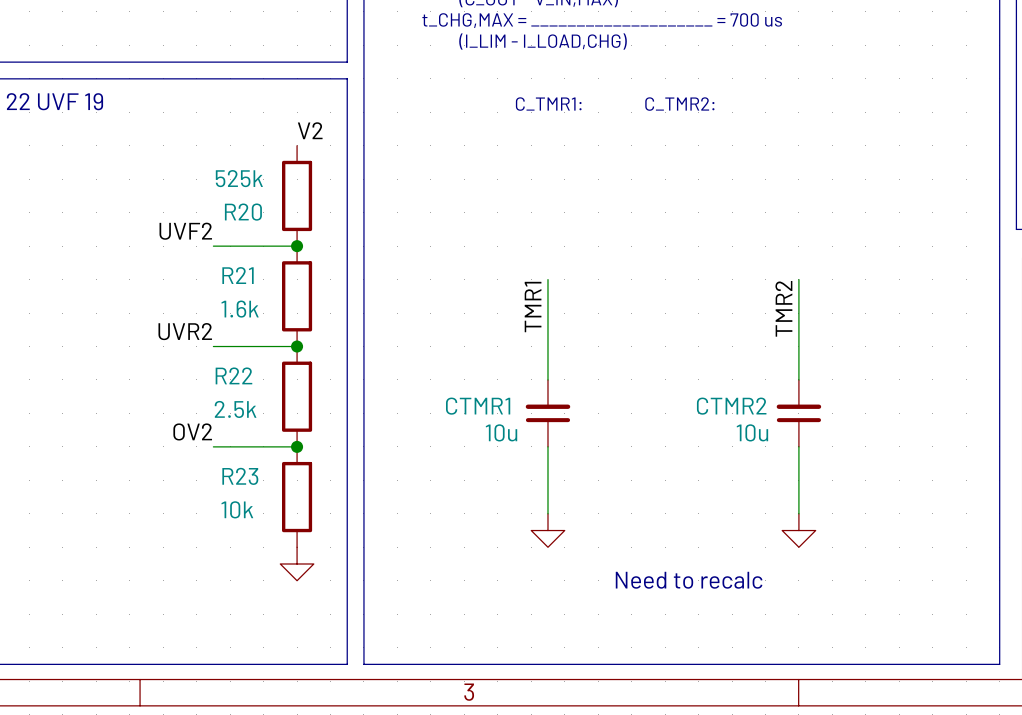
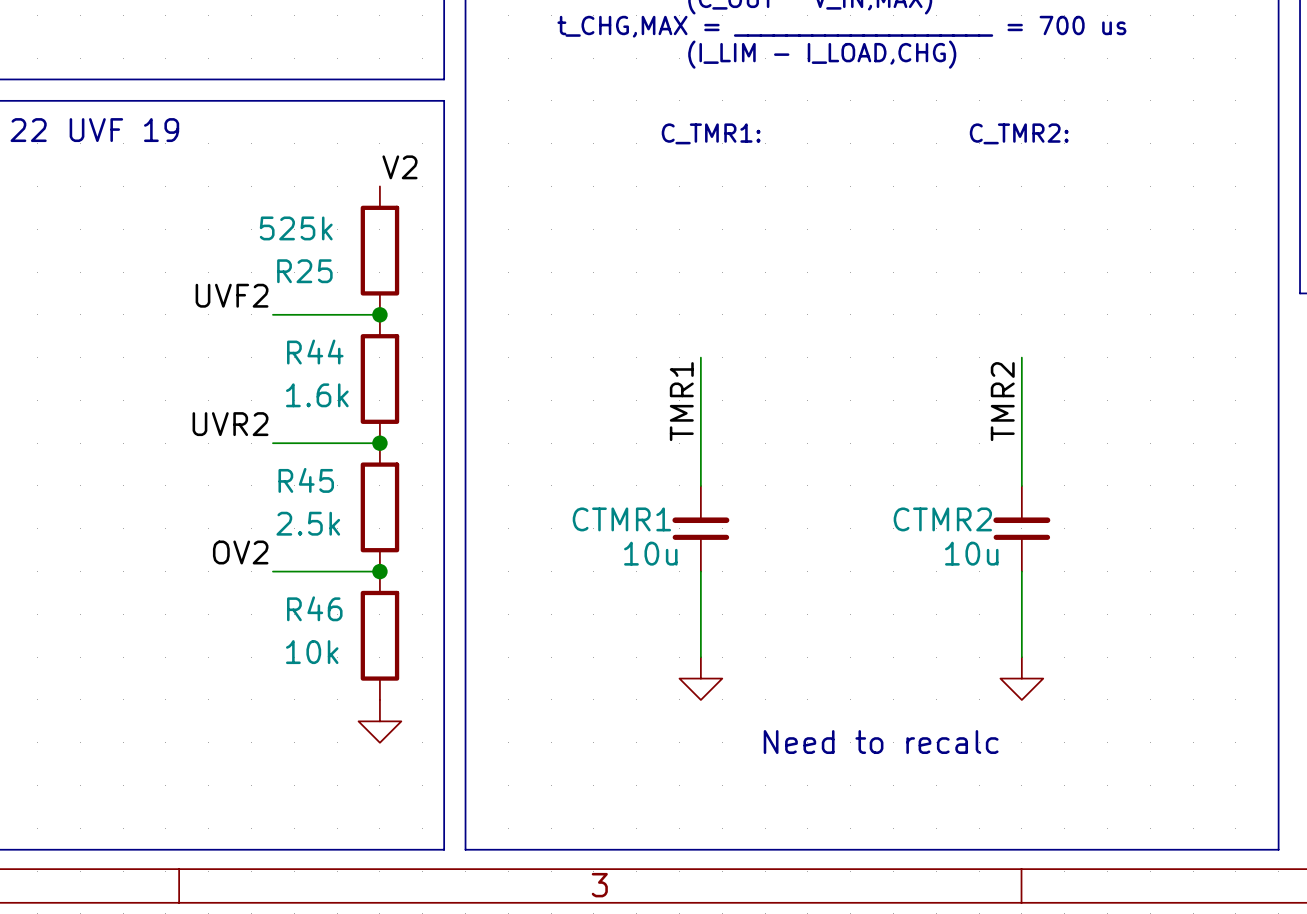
R20 name: R20 (243, 212) -> R25 (304, 271)
R21 name: R21 (238, 275) -> R44 (315, 352)
R22 name: R22 (233, 375) -> R45 (306, 480)
R23 name: R23 (240, 476) -> R46 (314, 608)

